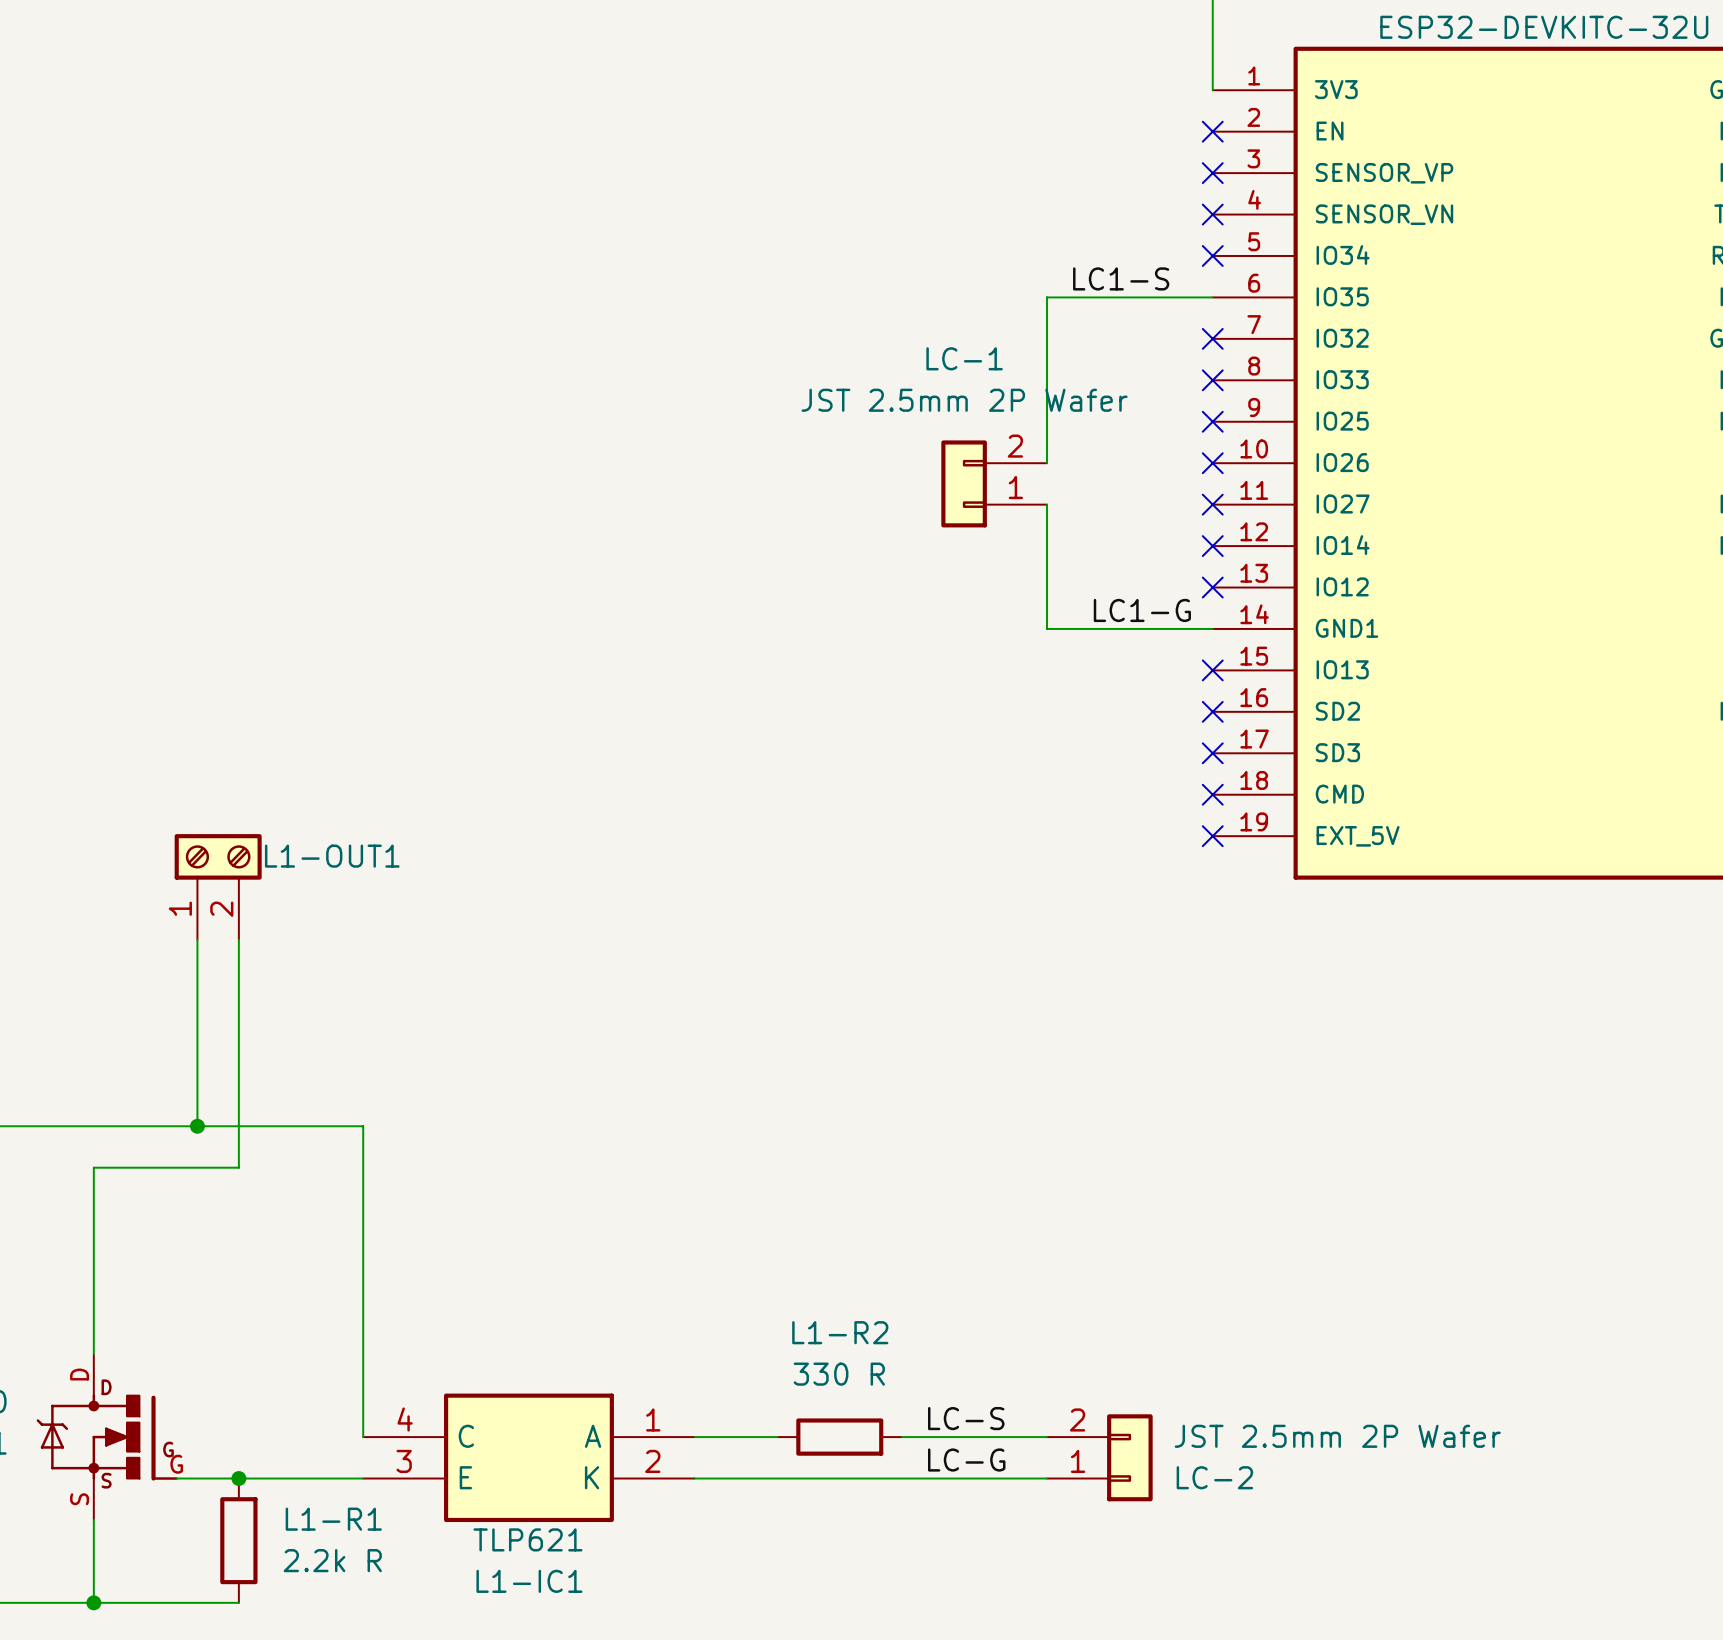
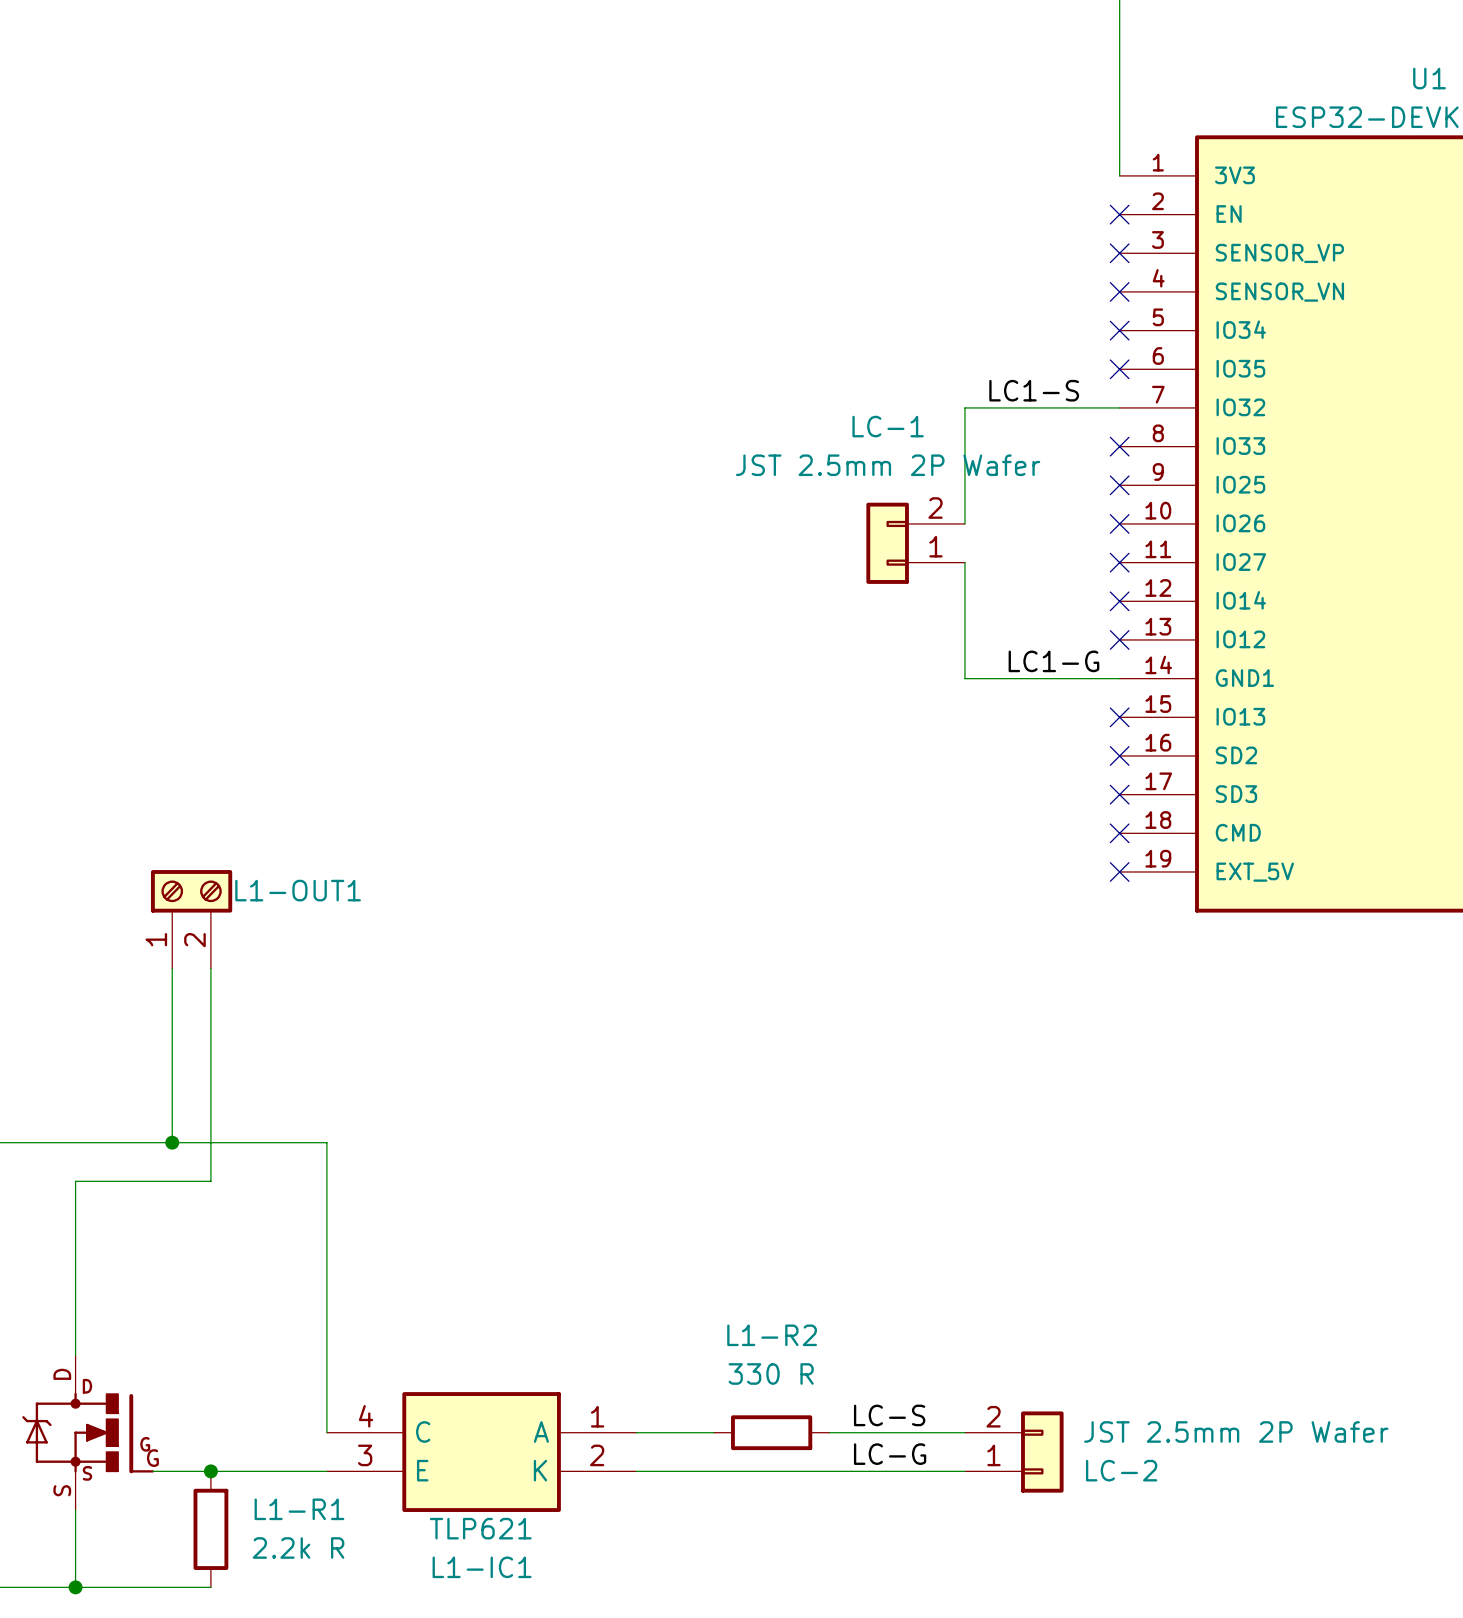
label position: LC1-S (1121, 278) -> LC1-S (1034, 390)
wire: (1212, 297) (1046, 297) (1046, 338) -> (1119, 407) (964, 407)
no-connect mark position: (1212, 338) -> (1119, 369)

